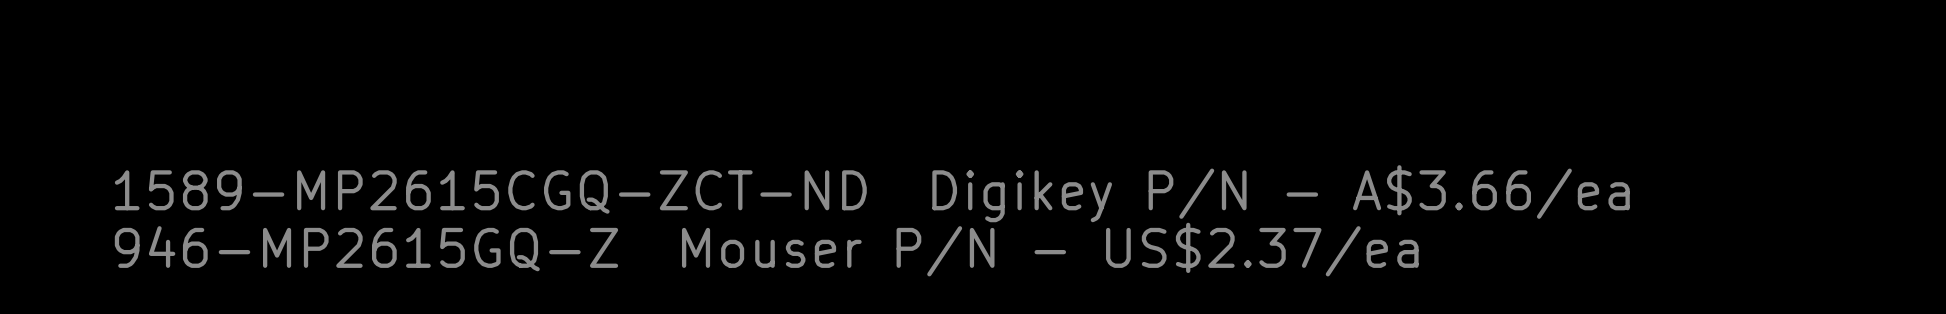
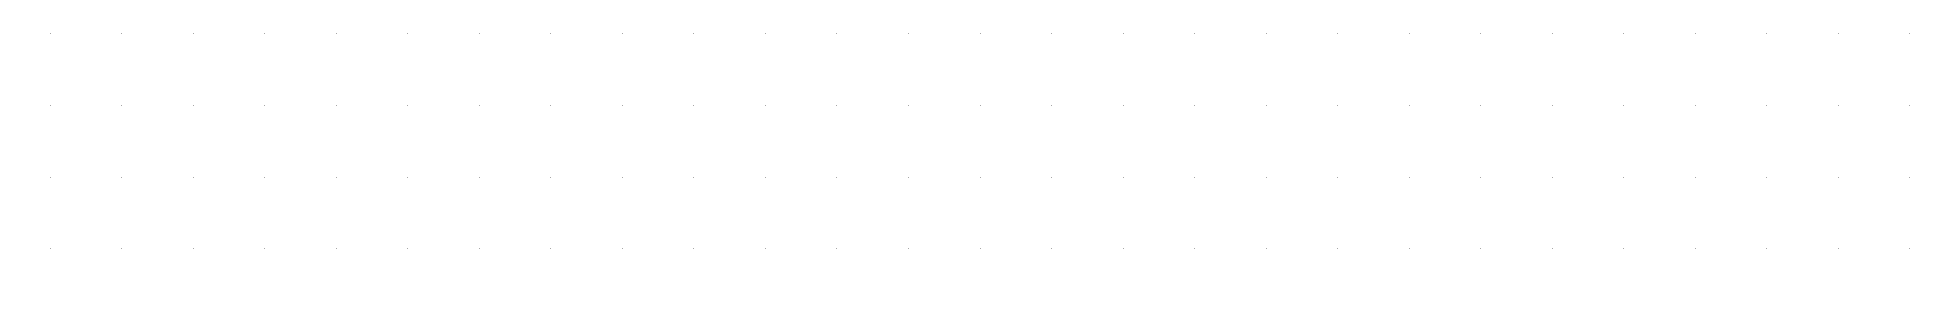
text: 1589-MP2615CGQ-ZCT-ND Digikey P/N - A$3.66/ea (872, 193) -> none
text: 946-MP2615GQ-Z Mouser P/N - US$2.37/ea (766, 249) -> none

